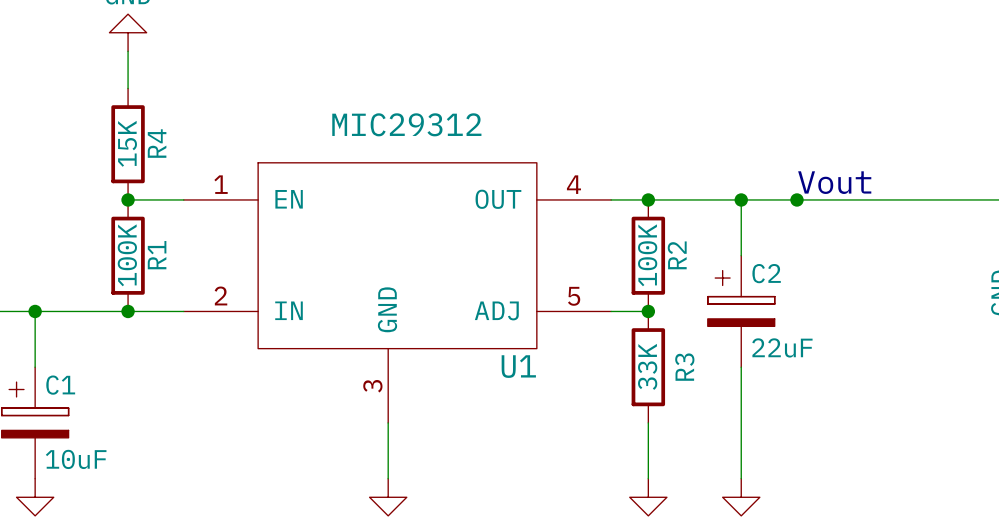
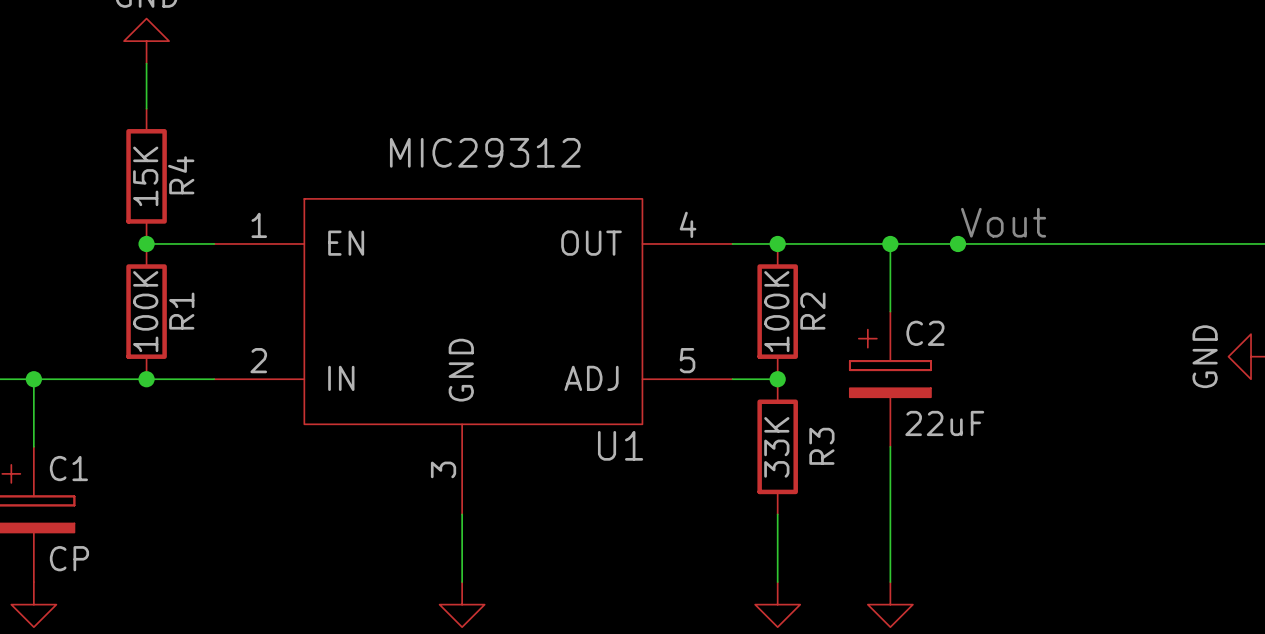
C1 value: 10uF (76, 459) -> CP (69, 558)

